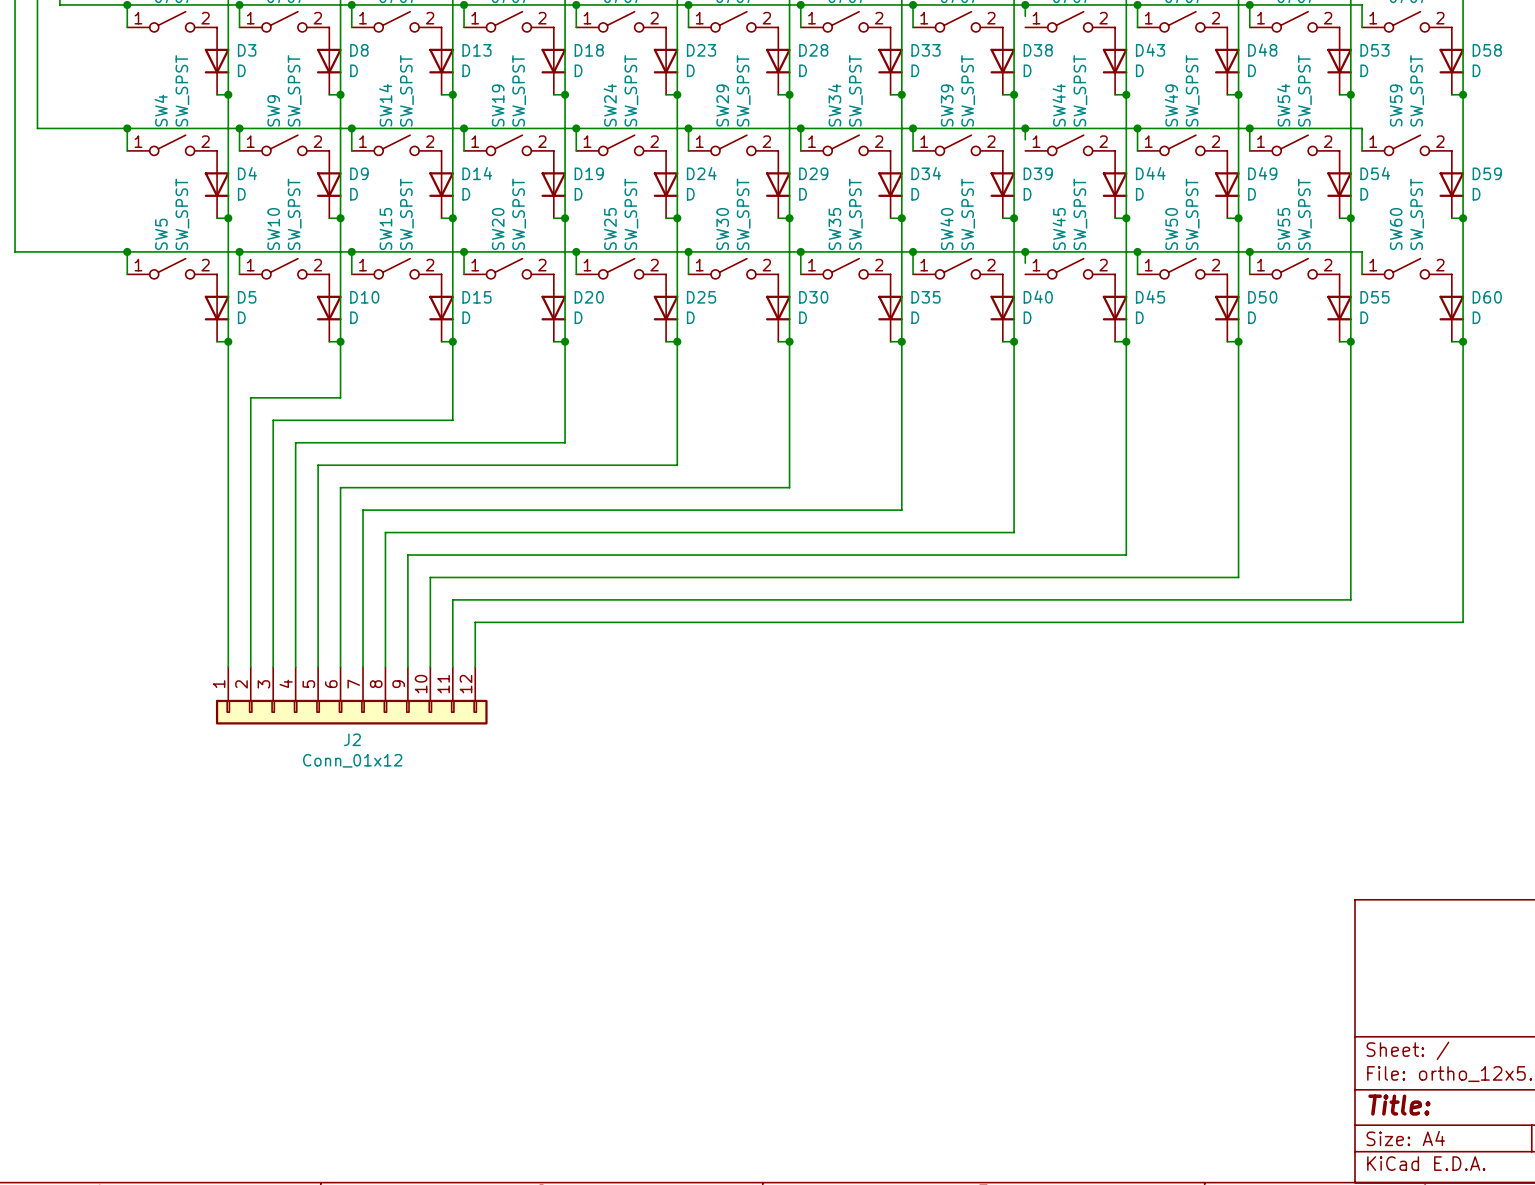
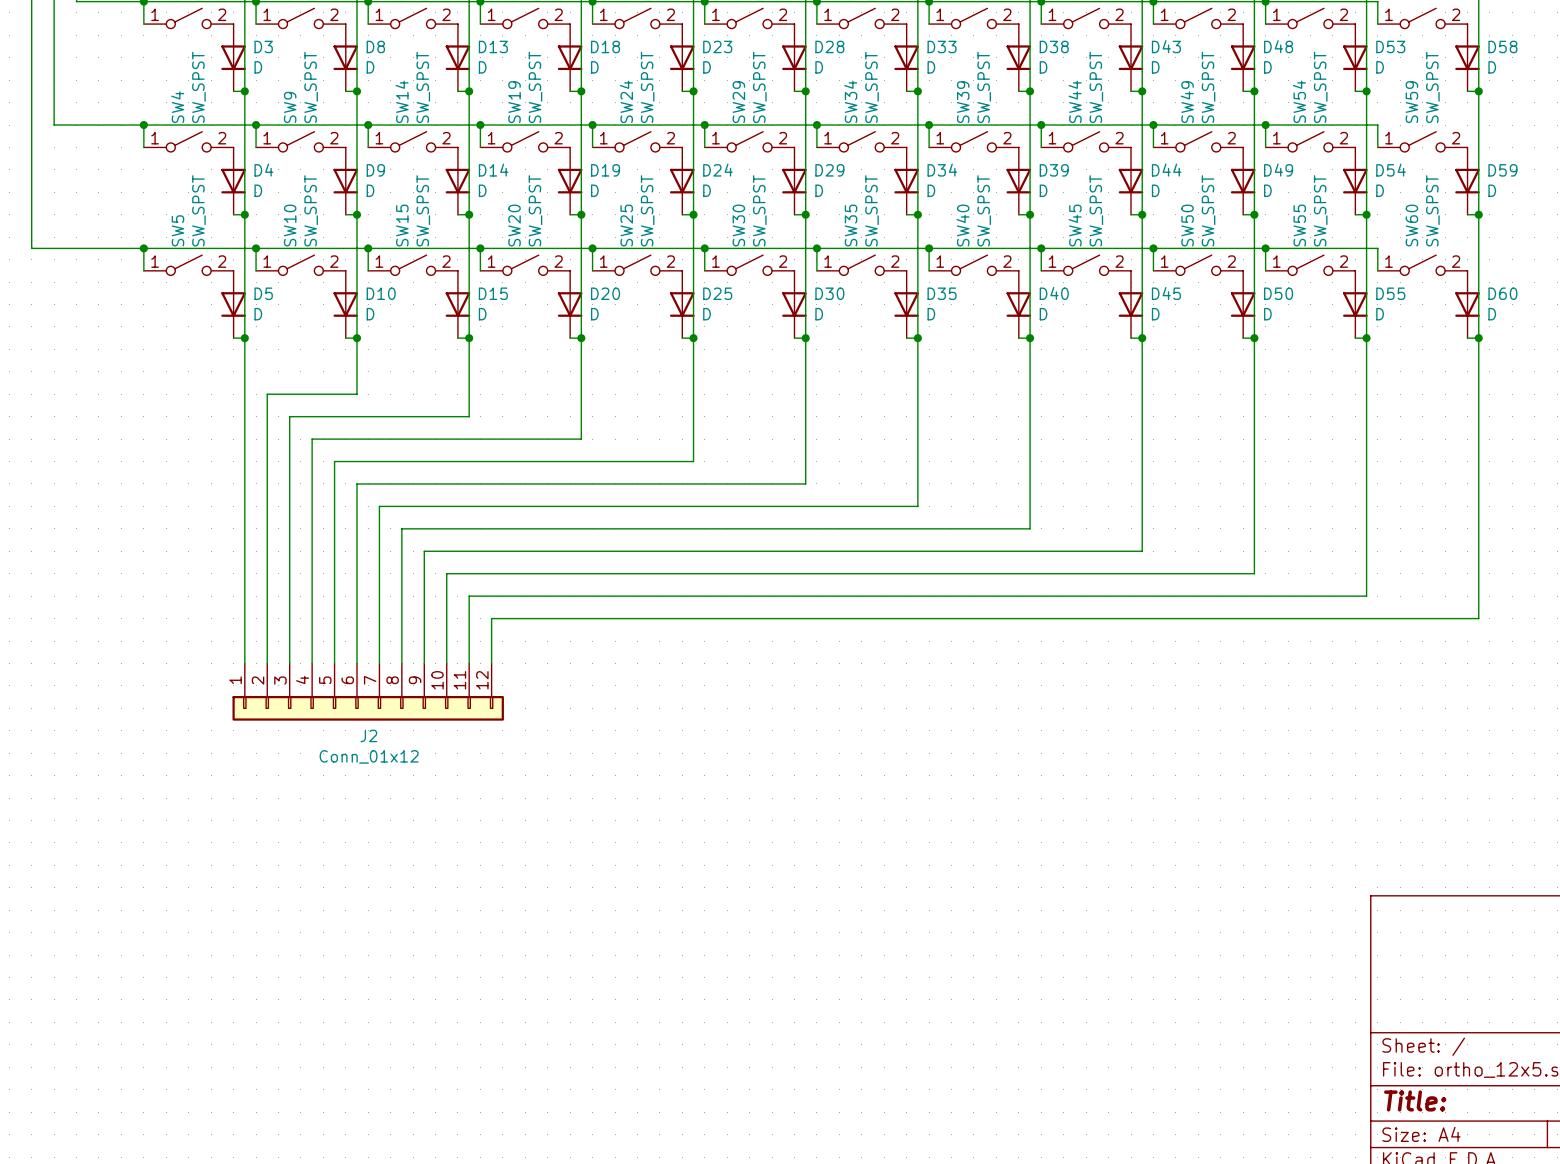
wire: none -> (1041, 12) (1041, 24)
wire: none -> (1041, 136) (1041, 147)
wire: none -> (1041, 259) (1041, 270)

